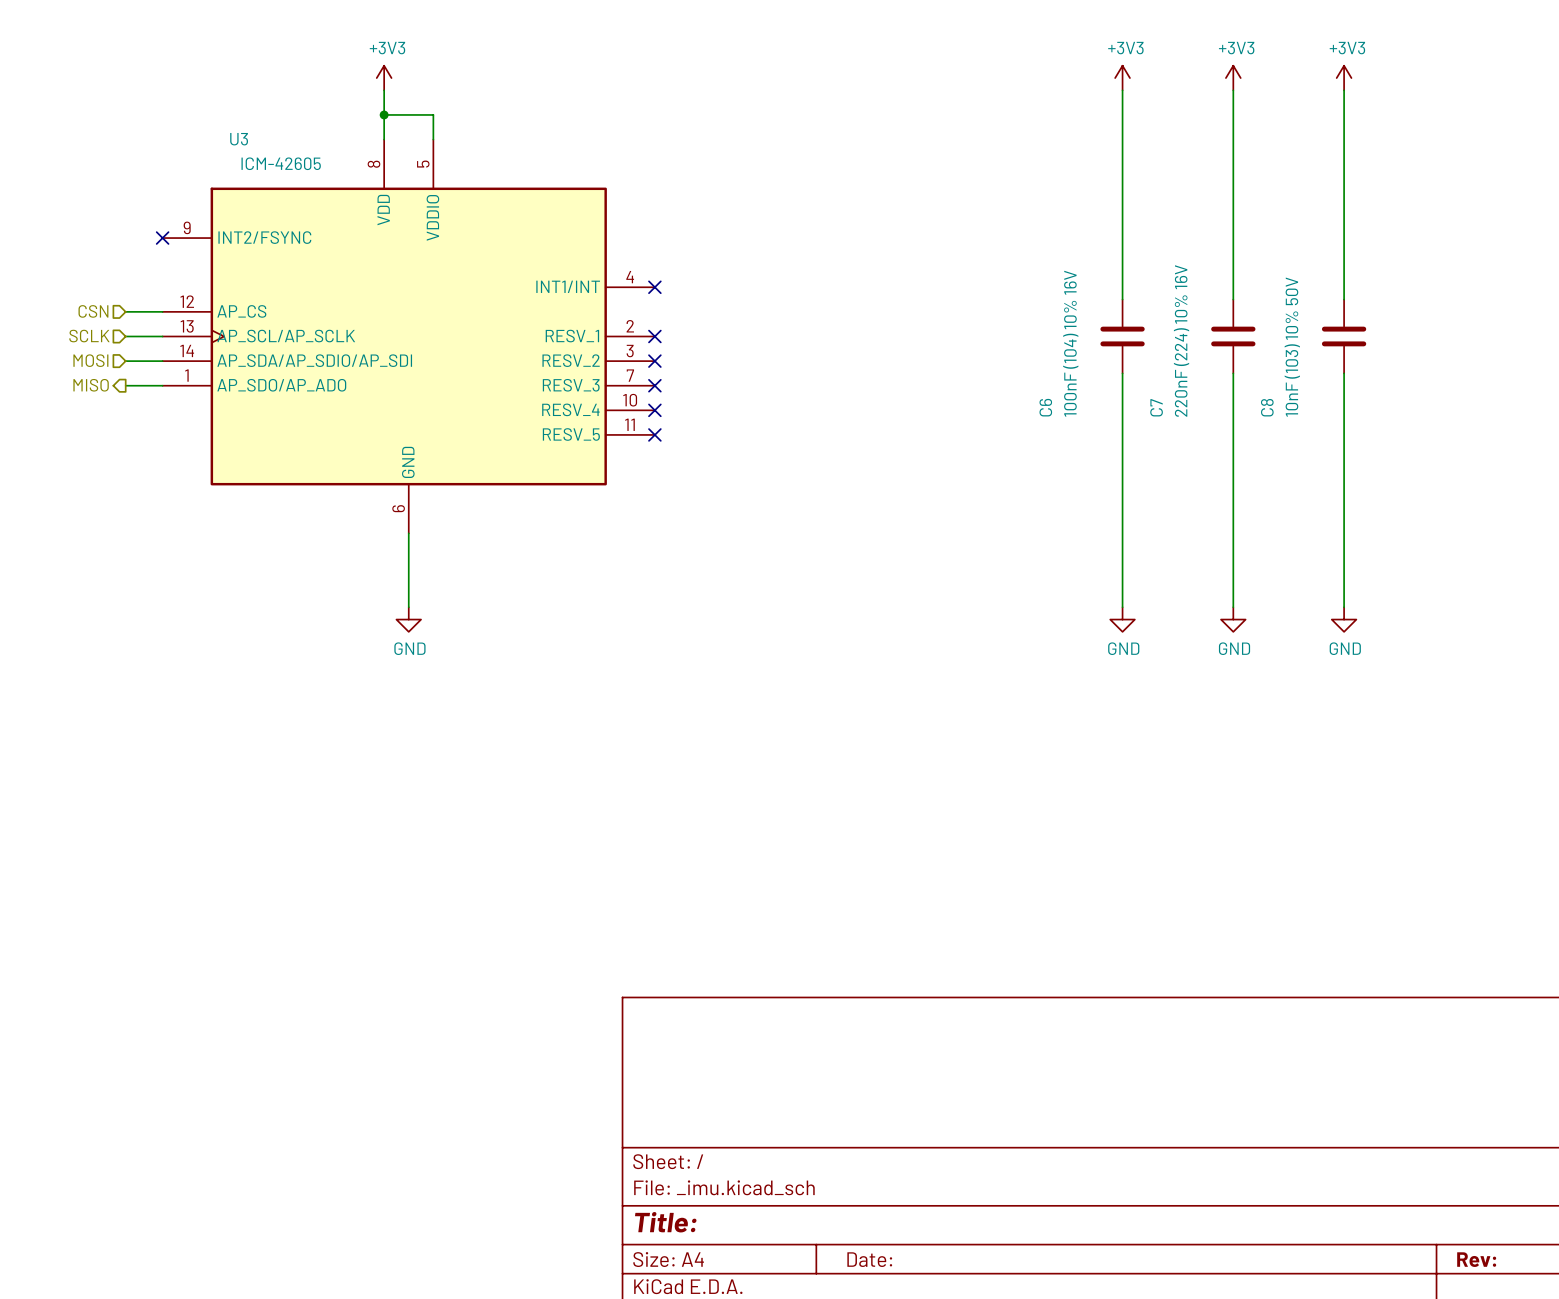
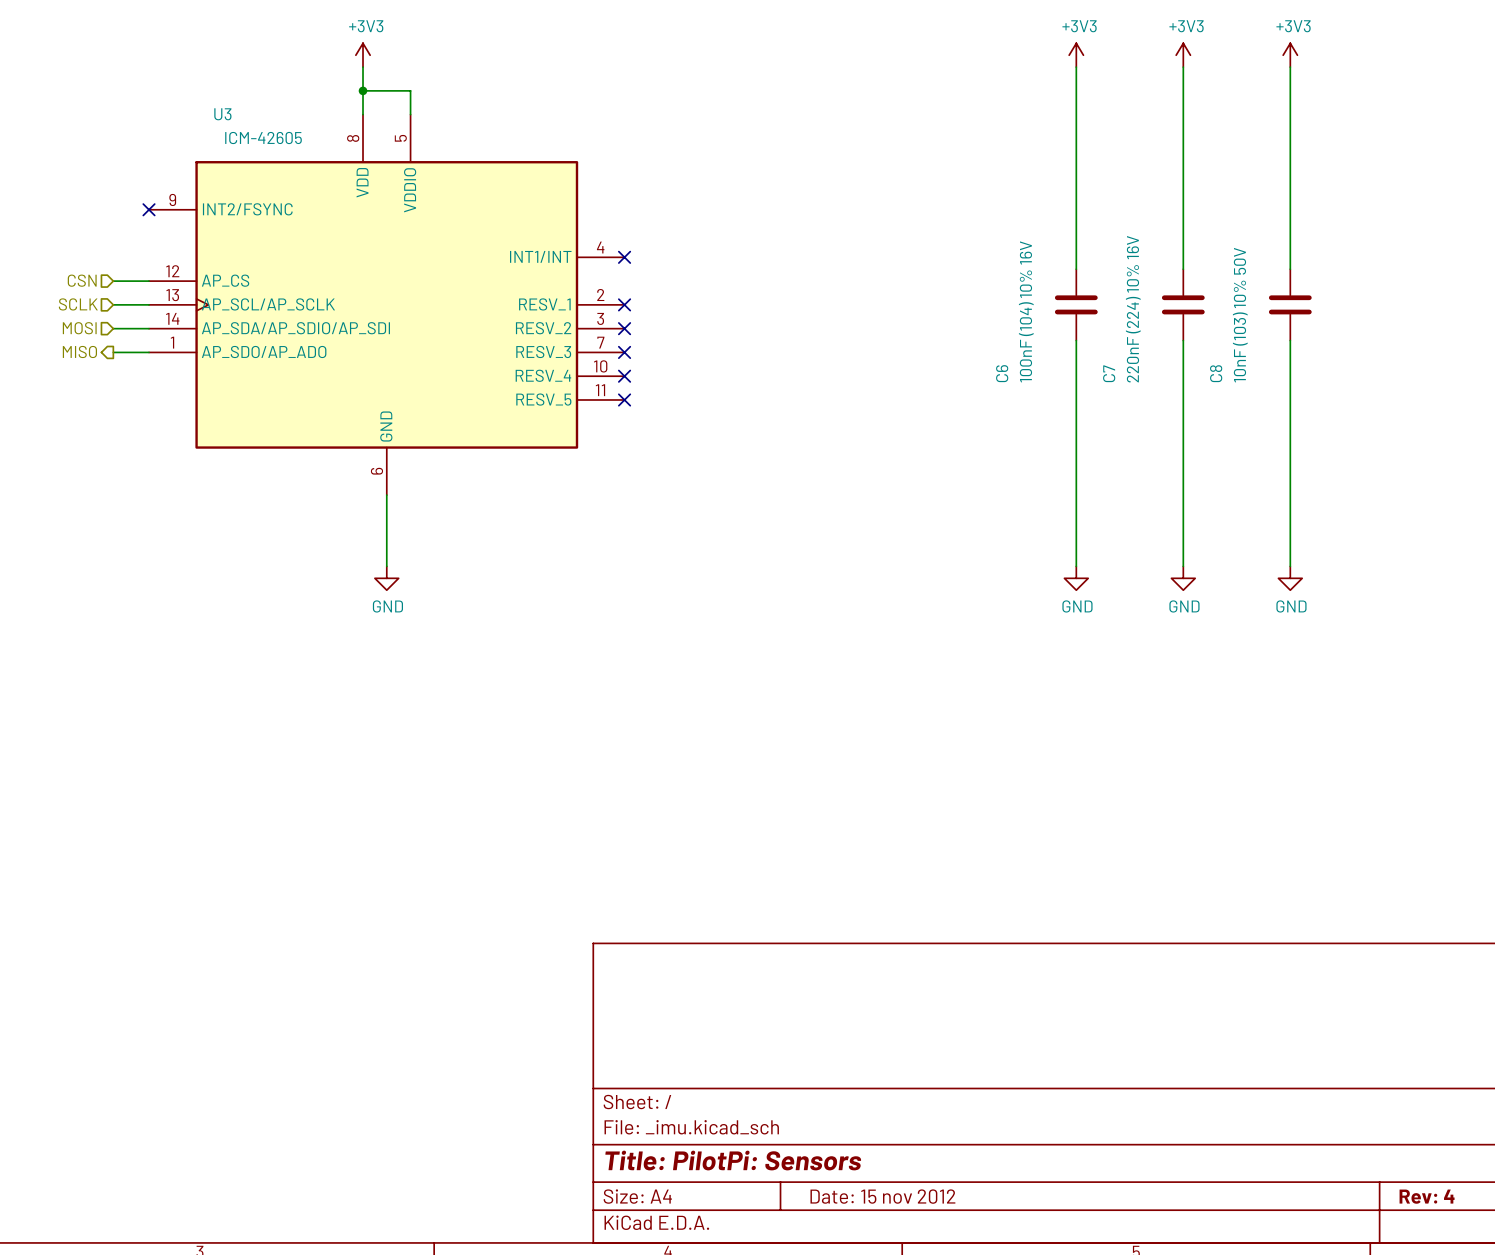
title block: Title: (665, 1222) -> Title: PilotPi: Sensors (733, 1160)
title block: Date: (869, 1259) -> Date: 15 nov 2012 (882, 1196)
title block: Rev: (1476, 1259) -> Rev: 4 (1427, 1196)

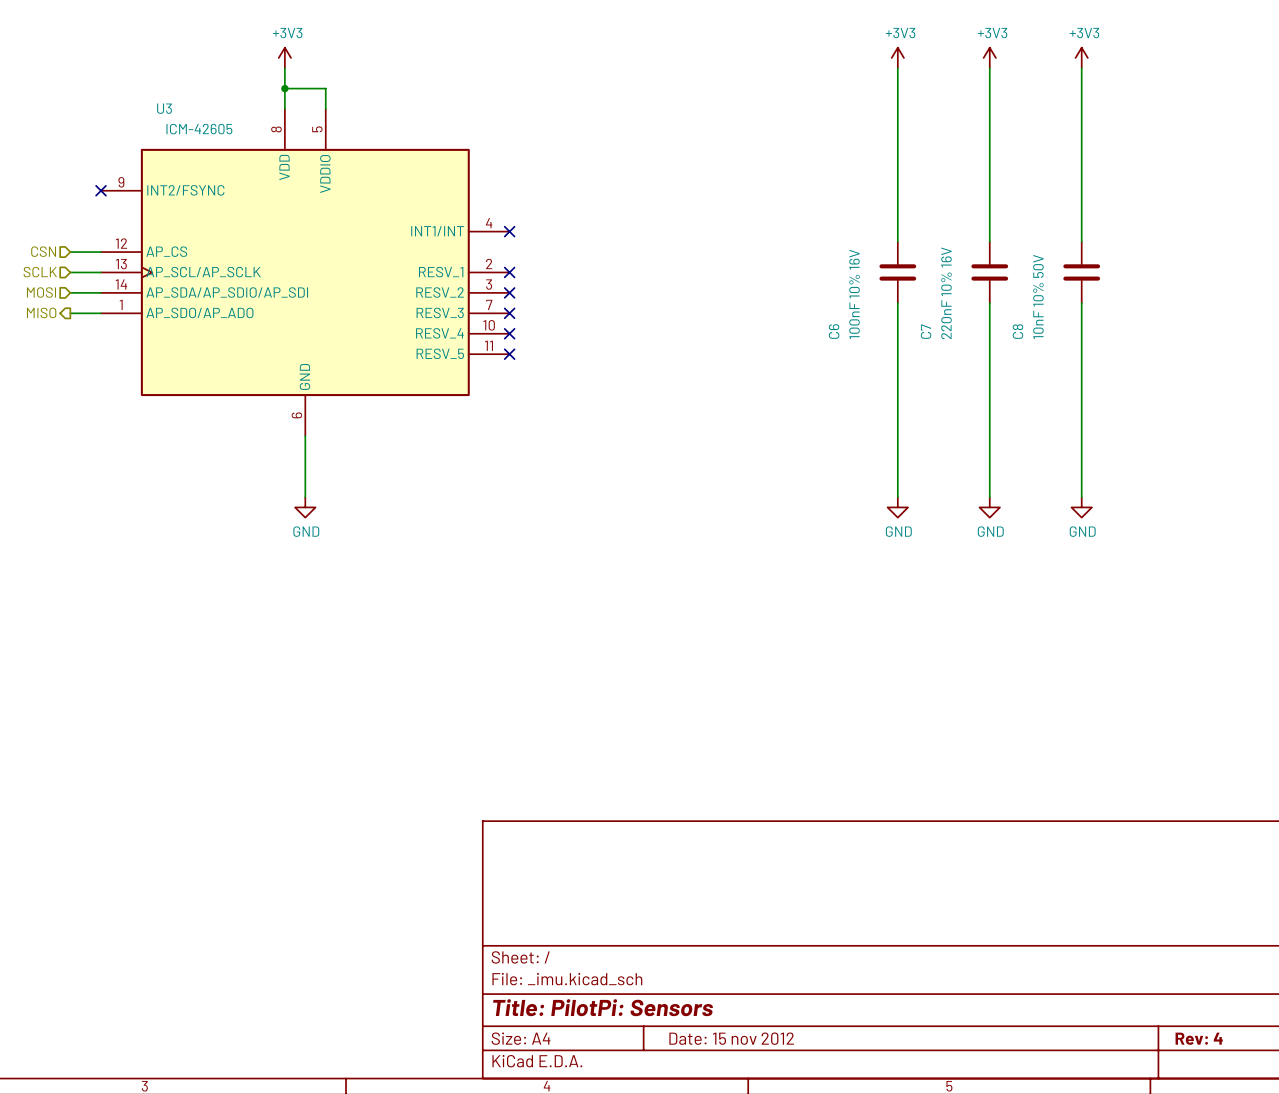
C7 value: 220nF (224) 10% 16V (1133, 309) -> 220nF 10% 16V (946, 293)
C6 value: 100nF (104) 10% 16V (1026, 311) -> 100nF 10% 16V (854, 294)
C8 value: 10nF (103) 10% 50V (1240, 315) -> 10nF 10% 50V (1038, 297)

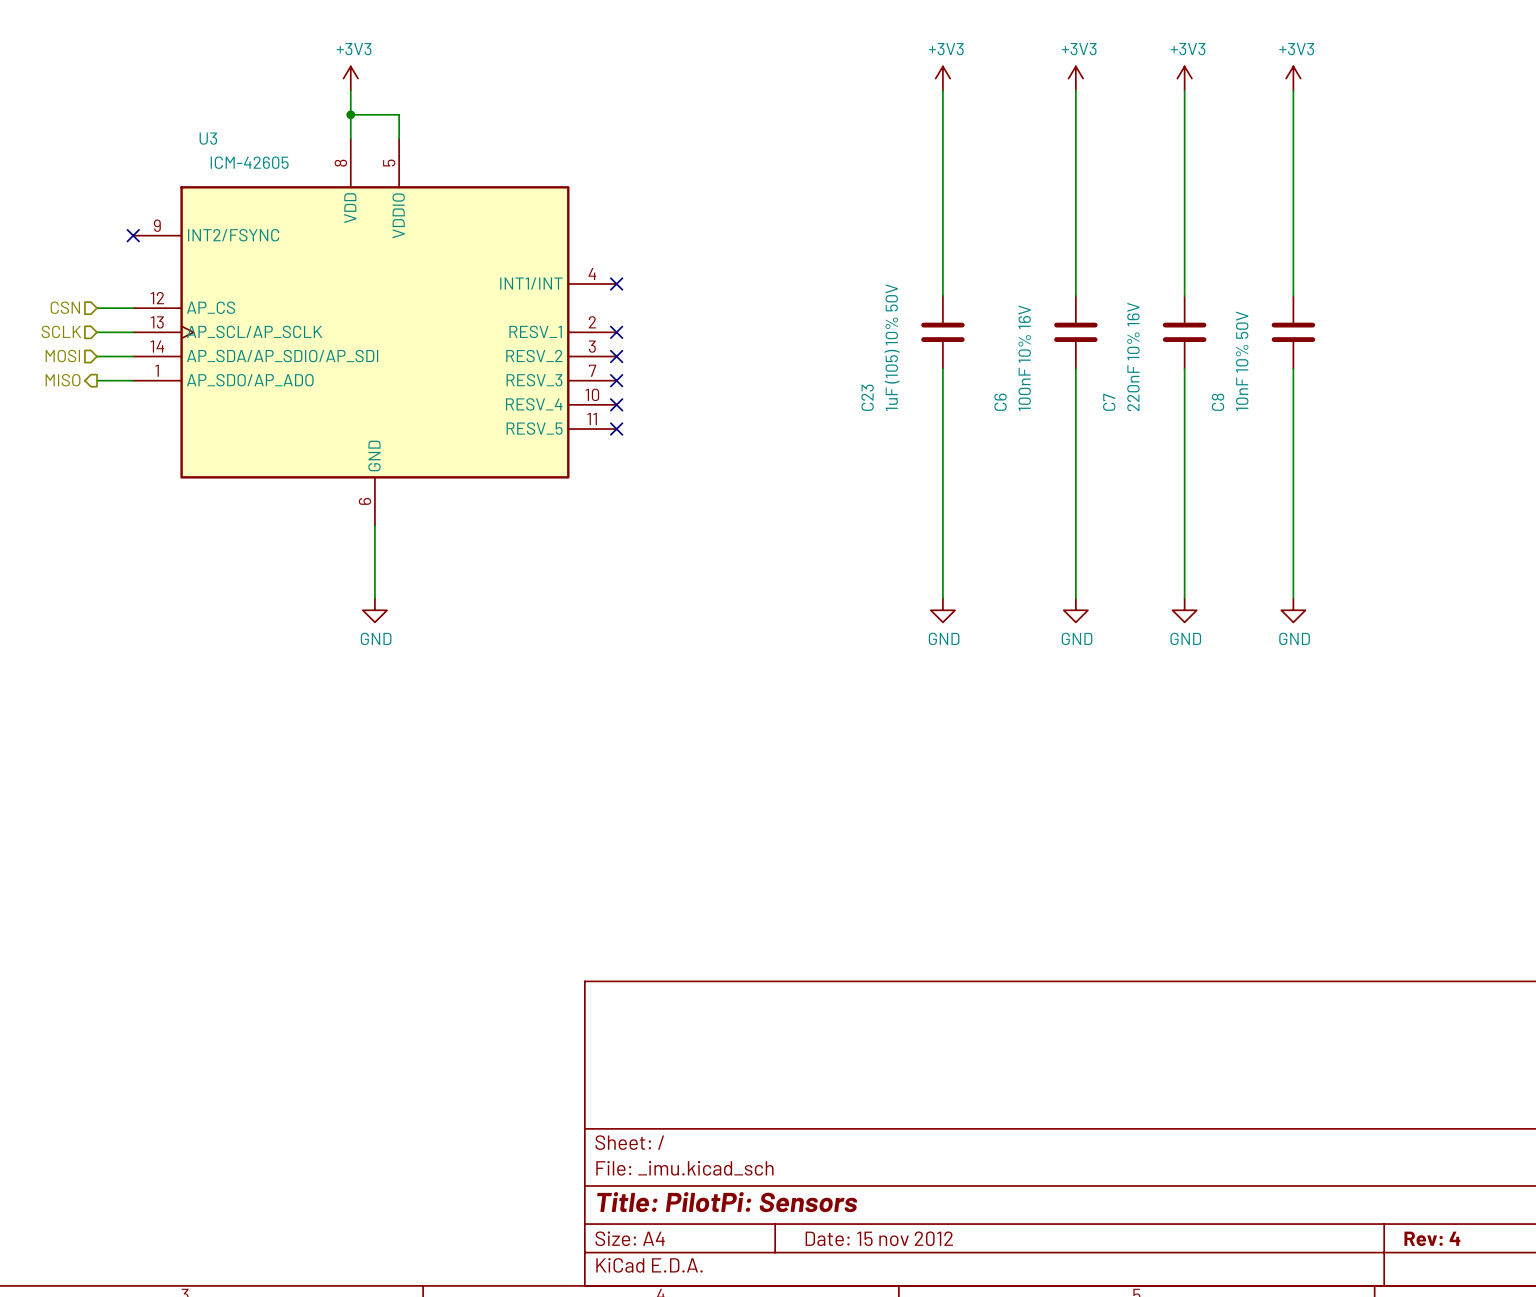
power symbol: none -> +3V3 (942, 78)
wire: none -> (942, 90) (942, 296)
C23: none -> 1uF (105) 10% 50V (942, 332)
wire: none -> (942, 368) (942, 598)
power symbol: none -> GND (942, 610)

